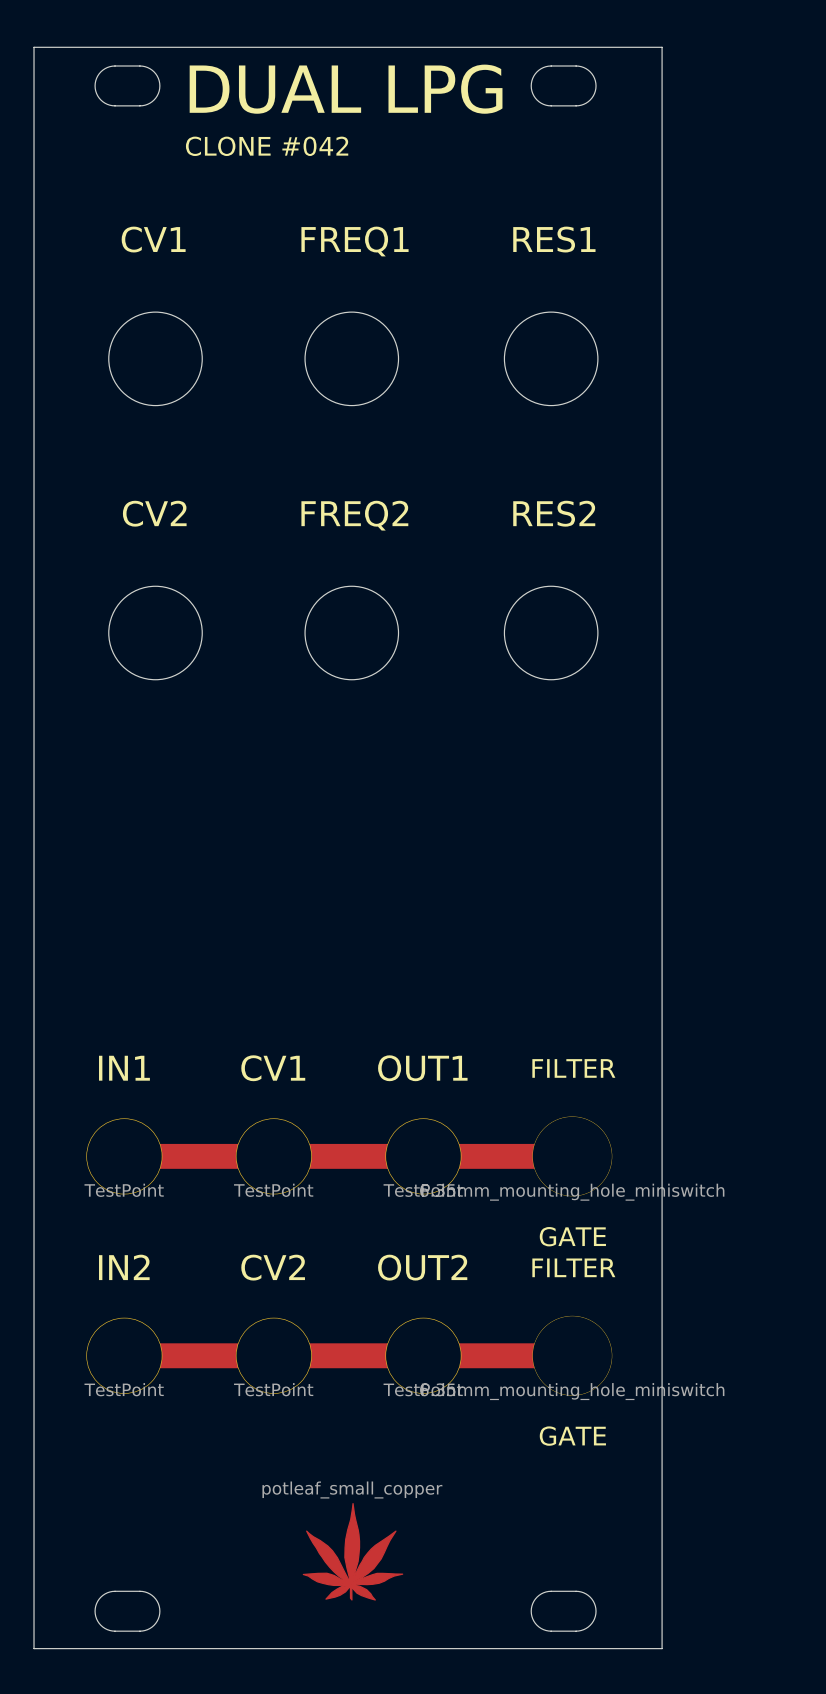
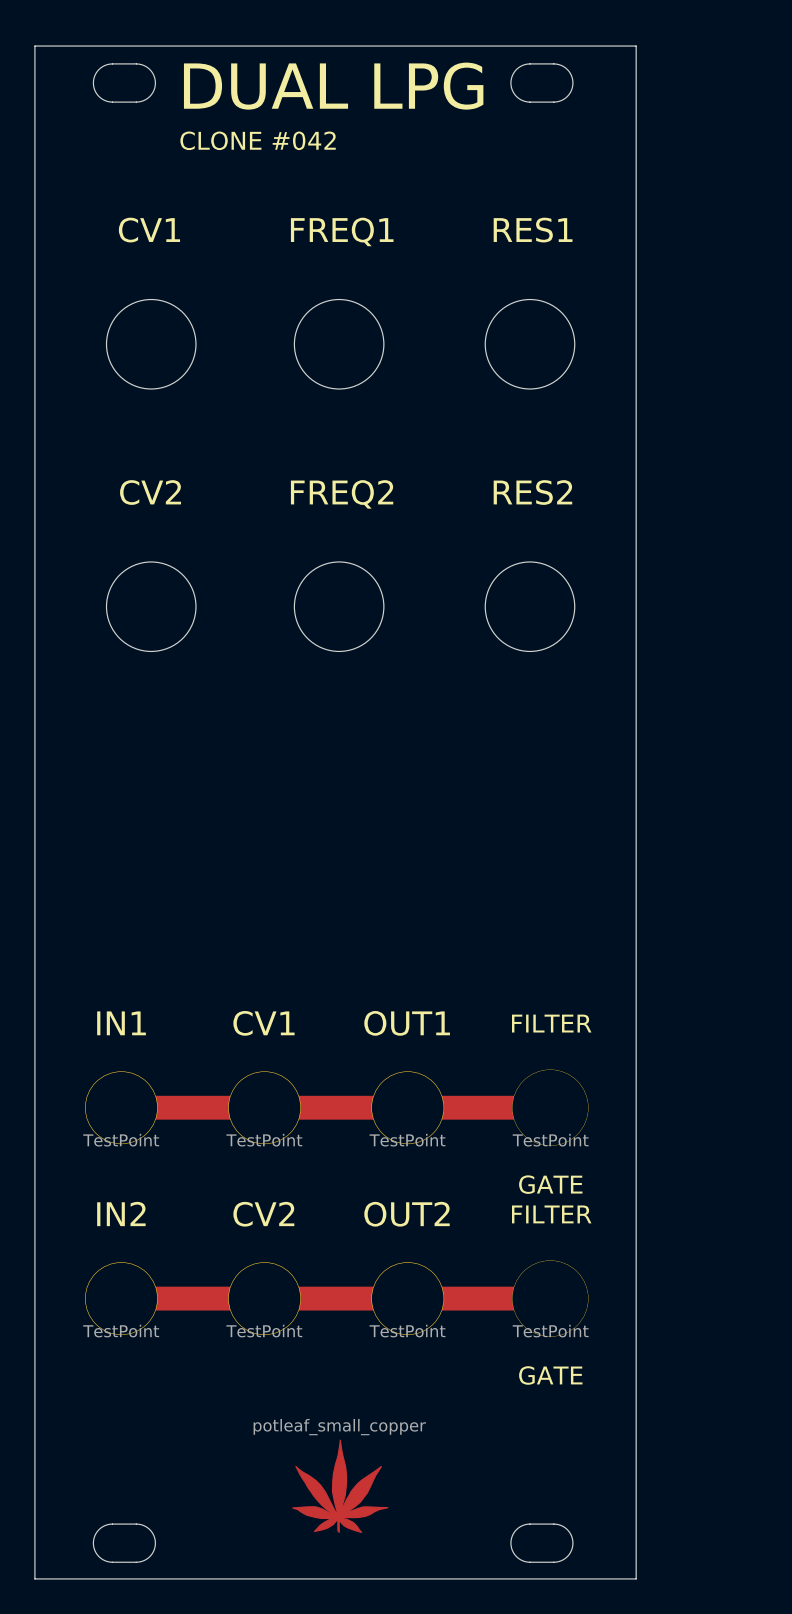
part value: 6.35mm_mounting_hole_miniswitch (572, 1192) -> TestPoint (550, 1140)
part value: 6.35mm_mounting_hole_miniswitch (572, 1391) -> TestPoint (550, 1331)

